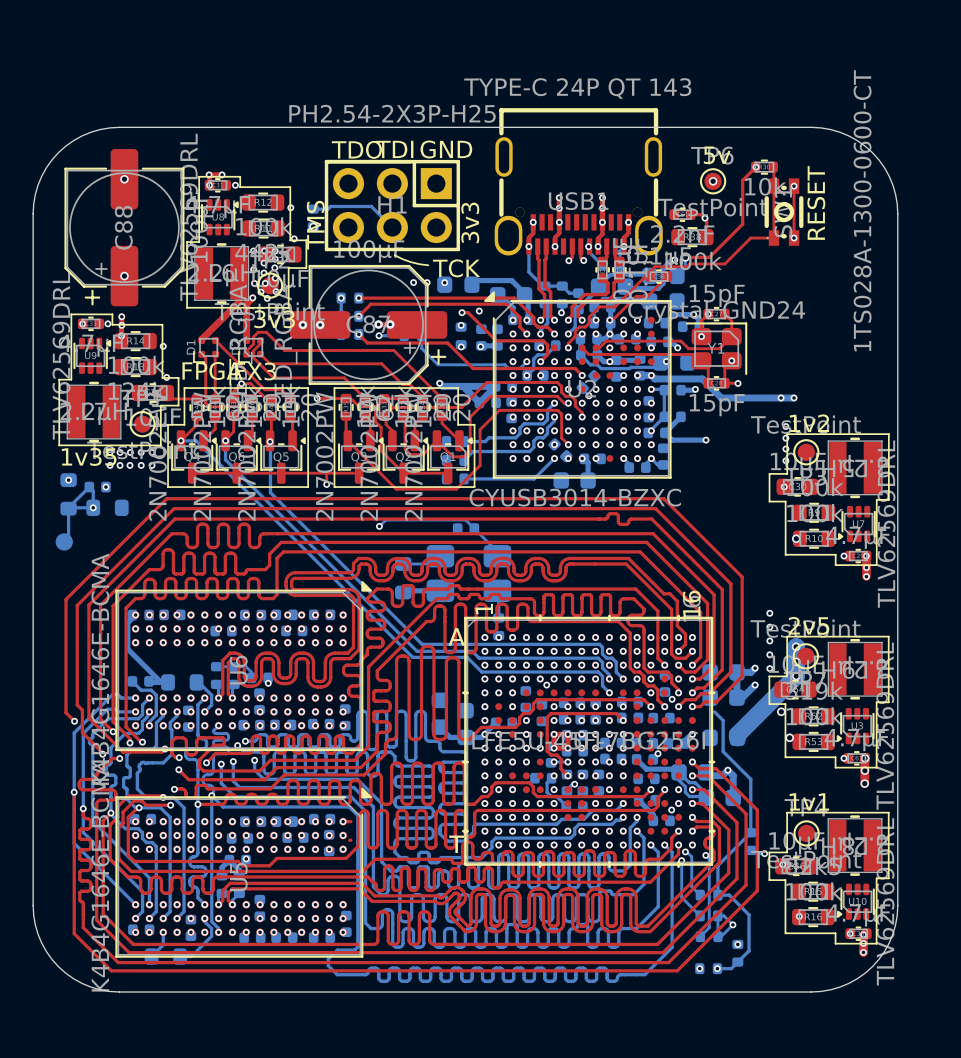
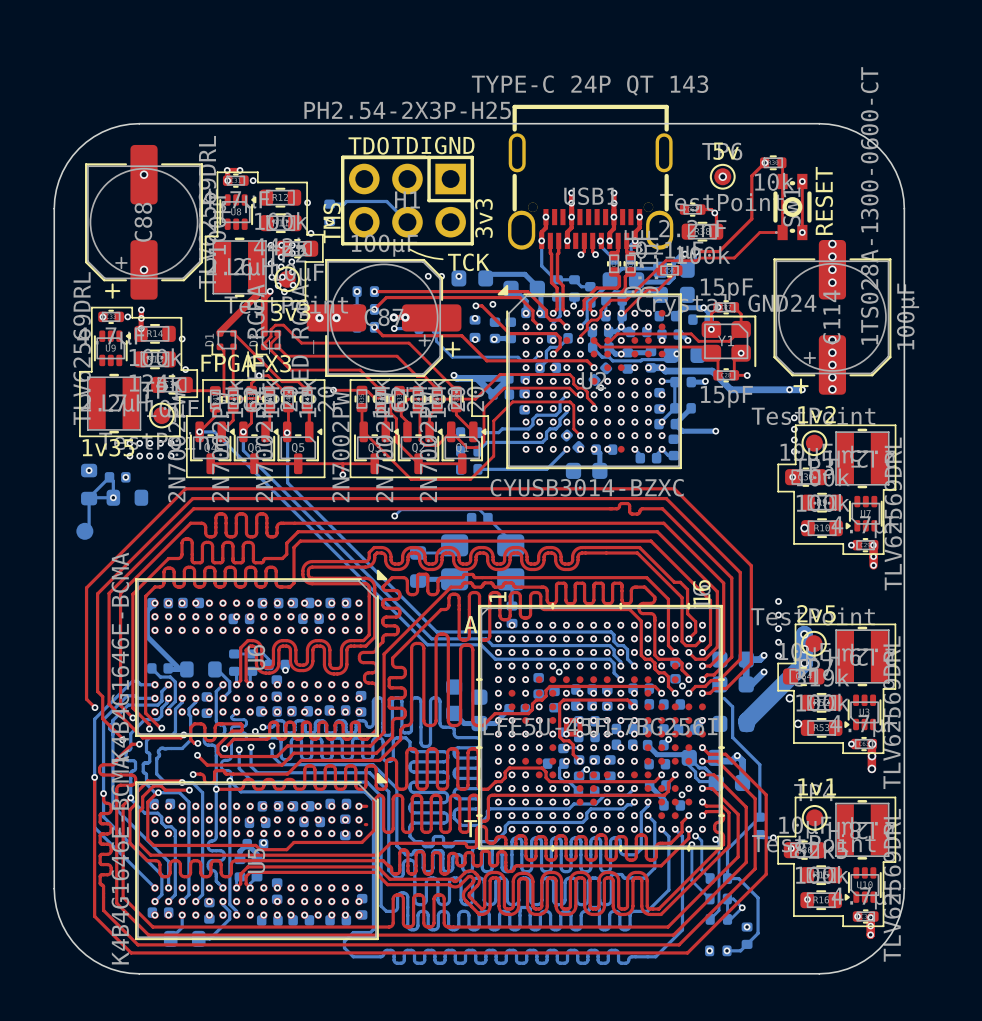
via: none -> (832, 244)
via: none -> (832, 256)
via: none -> (832, 269)
via: none -> (832, 282)
C114: none -> 100μF (832, 317)
via: none -> (832, 340)
via: none -> (832, 352)
via: none -> (832, 364)
via: none -> (832, 377)
via: none -> (832, 389)

